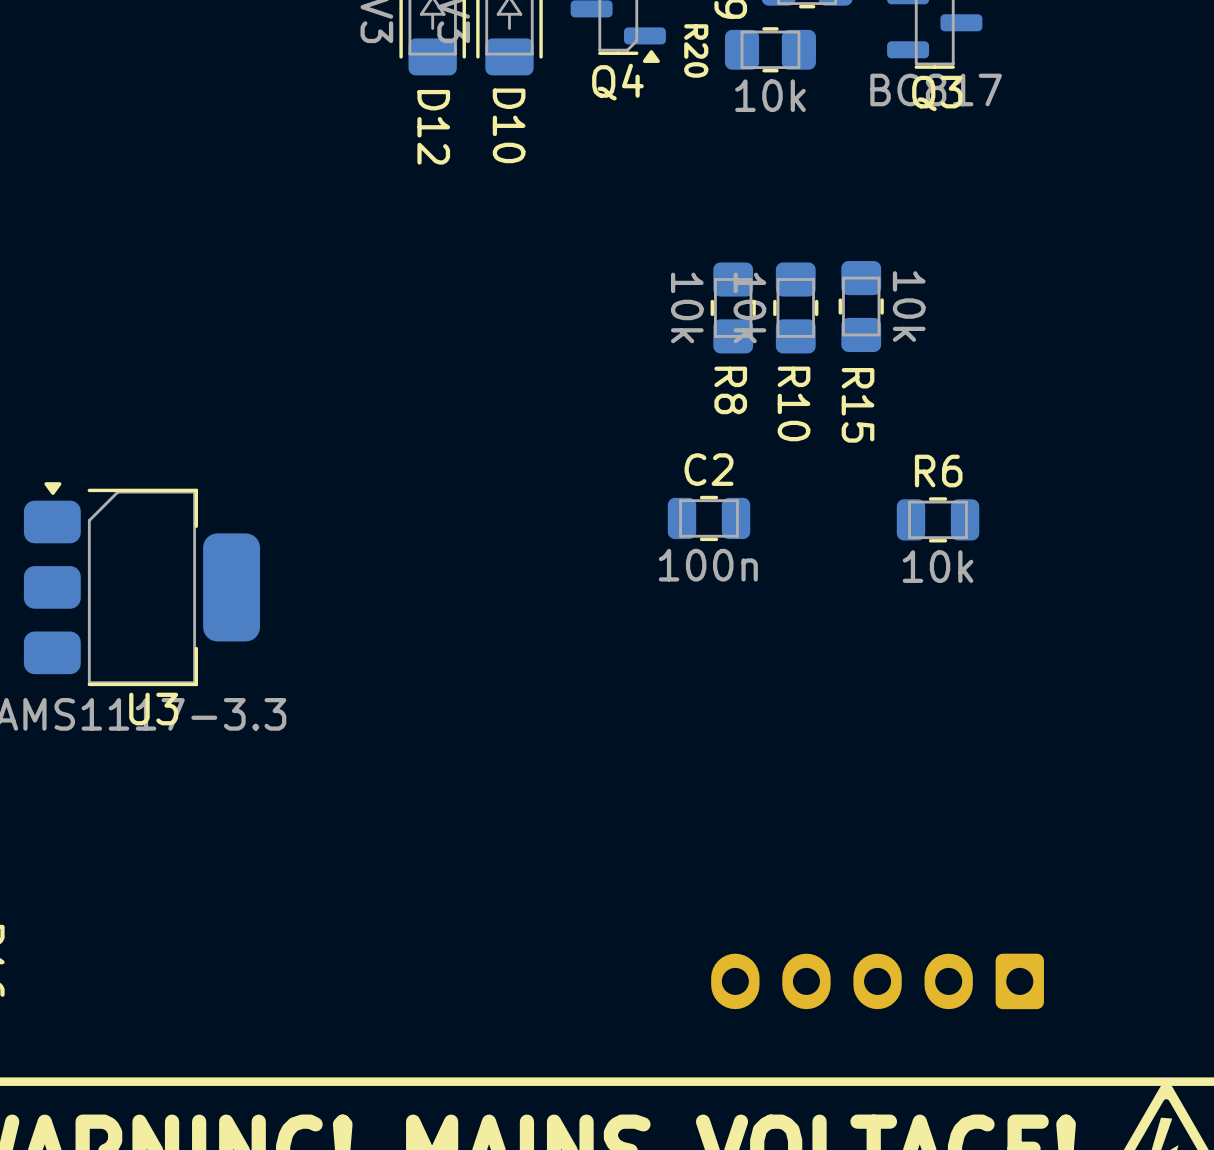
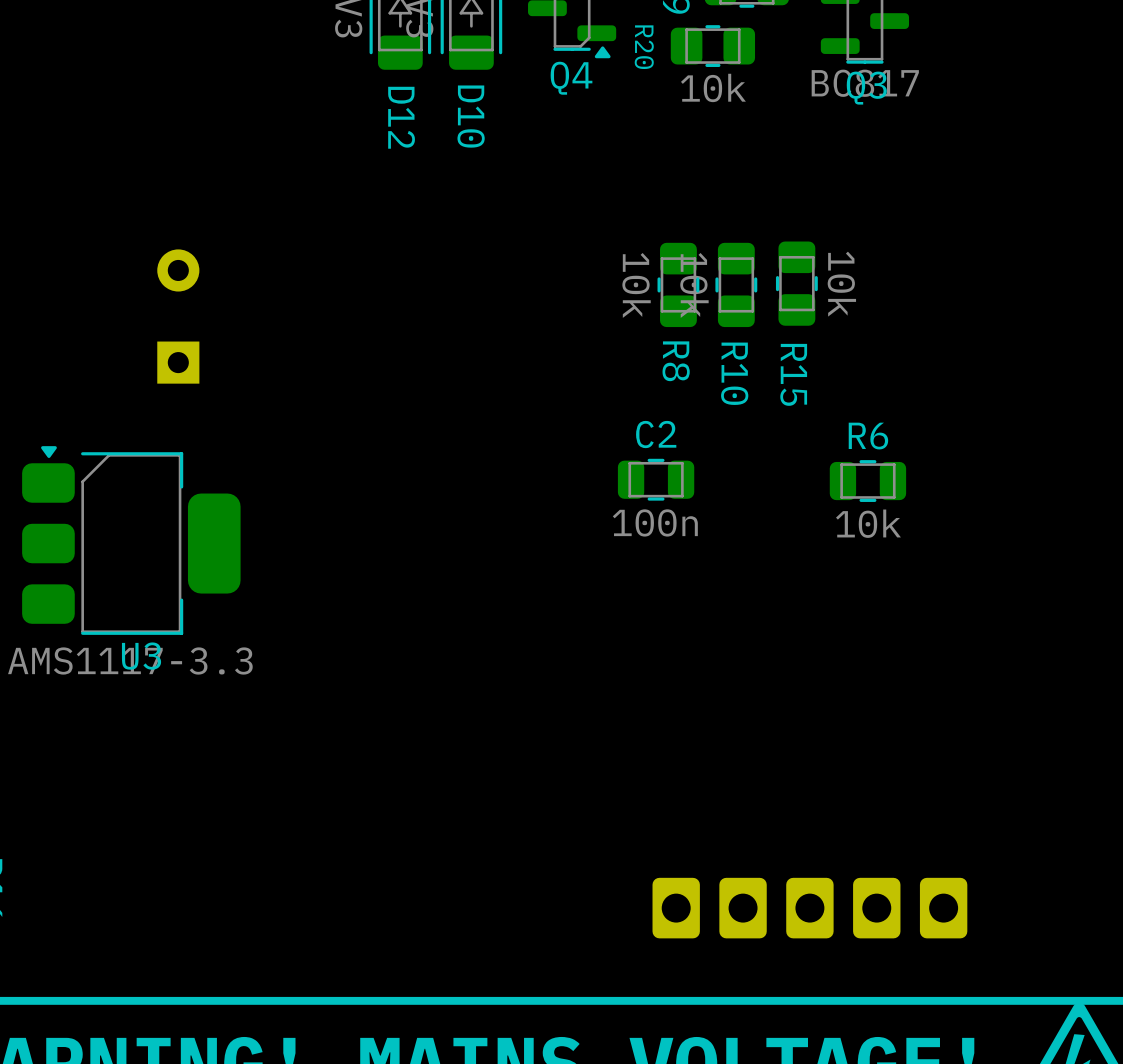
part: none -> (178, 316)
part footprint: [711, 953, 1044, 1010] -> [652, 877, 968, 939]

